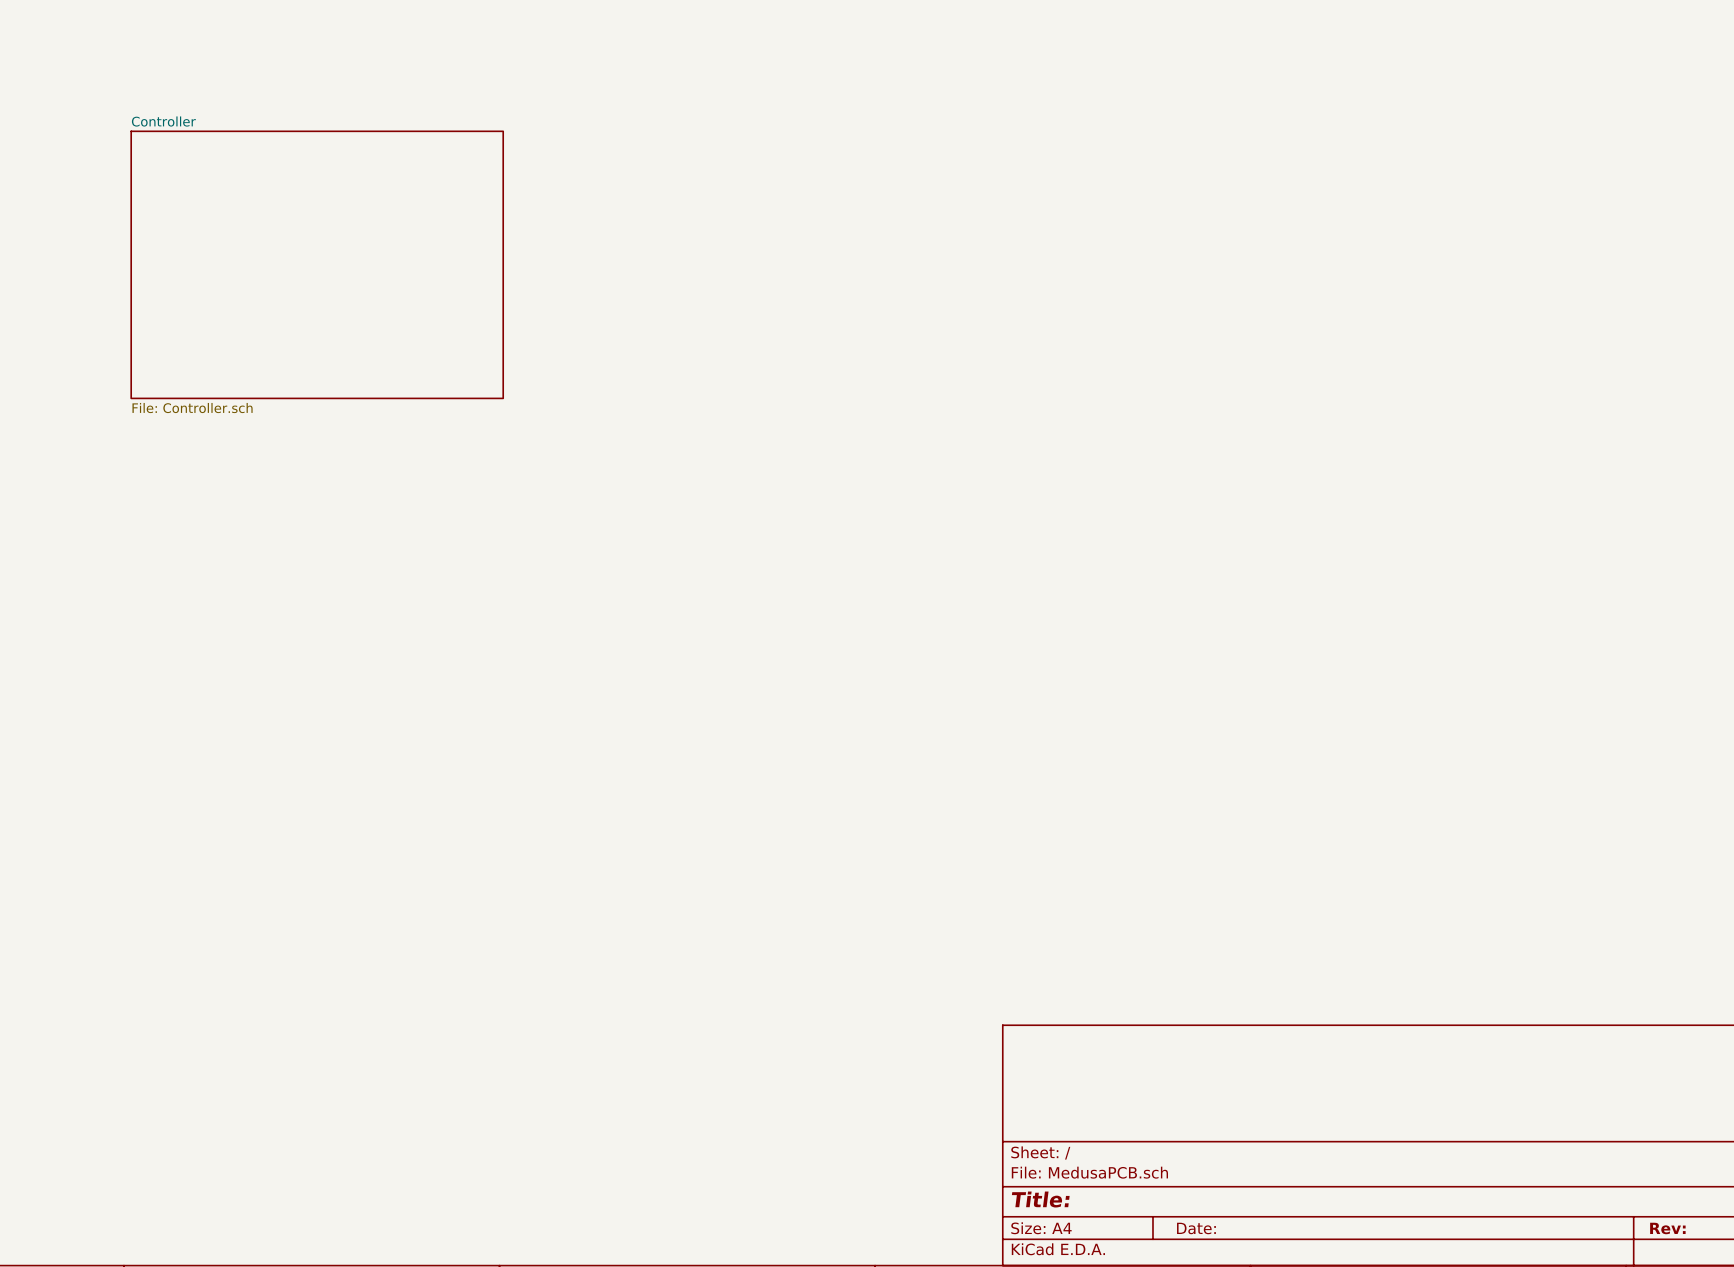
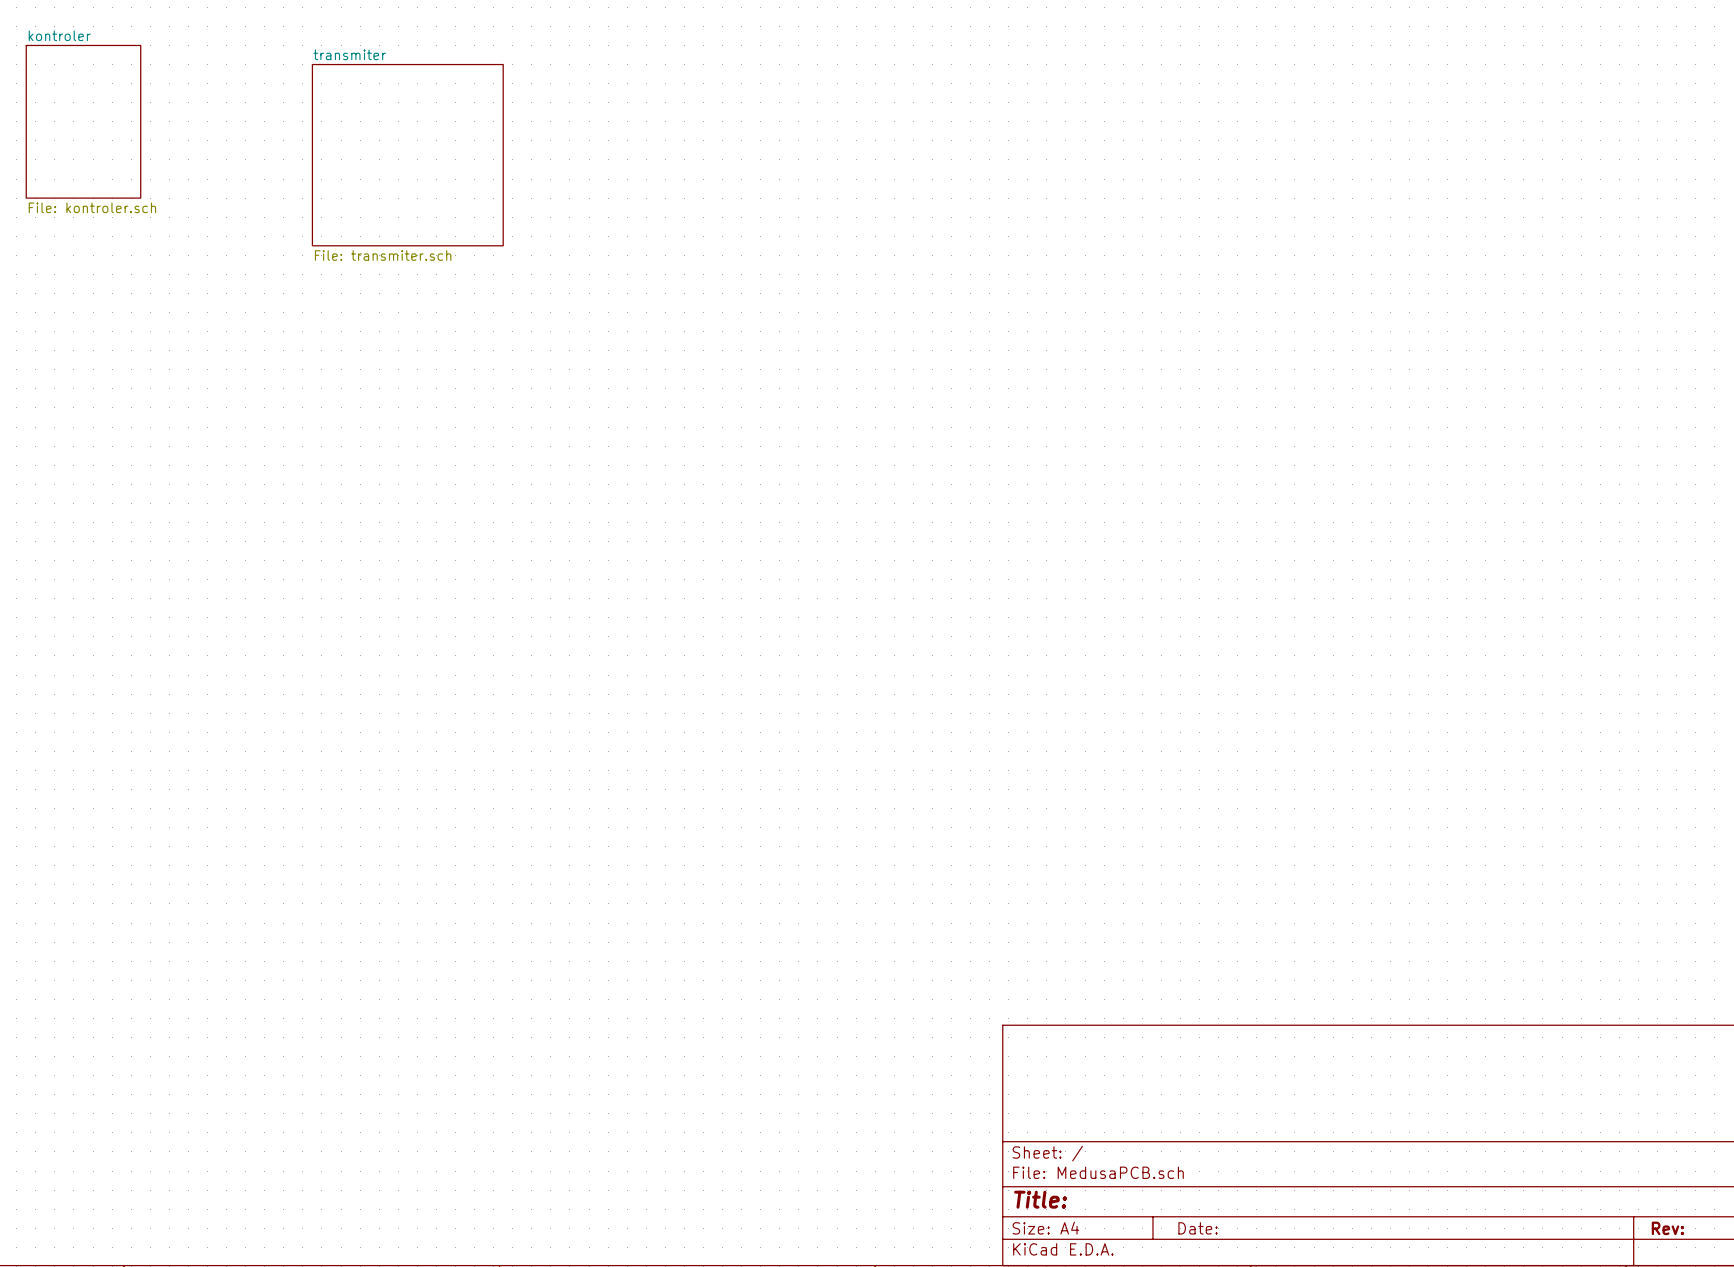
sheet kontroler: none -> File: kontroler.sch (83, 121)
sheet transmiter: none -> File: transmiter.sch (407, 155)
sheet Controller: File: Controller.sch (317, 264) -> none

